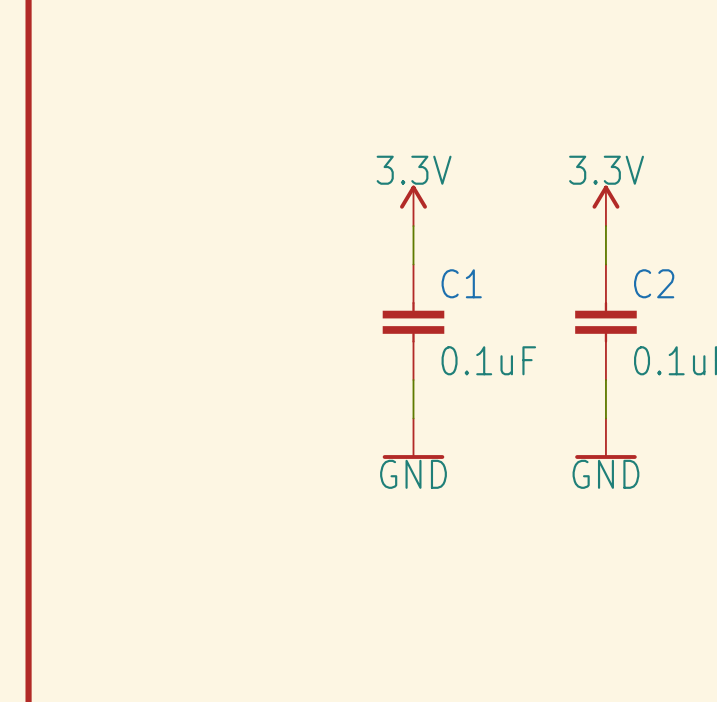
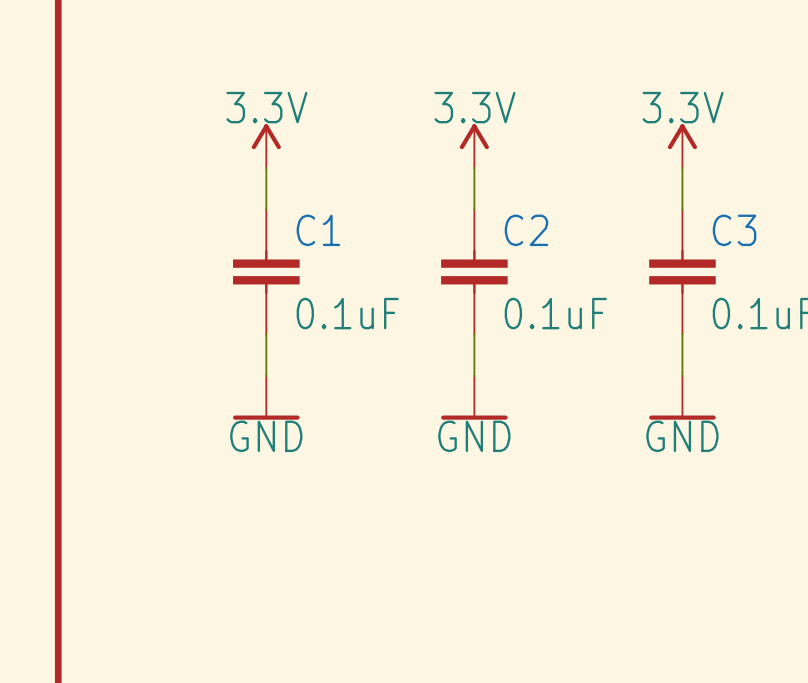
power symbol: none -> 3.3V (266, 146)
wire: none -> (266, 167) (266, 209)
C1 name: C1 (461, 283) -> C2 (526, 230)
C2 name: C2 (654, 283) -> C3 (734, 230)
C1: none -> 0.1uF (266, 271)
wire: none -> (266, 334) (266, 375)
power symbol: none -> GND (266, 397)

